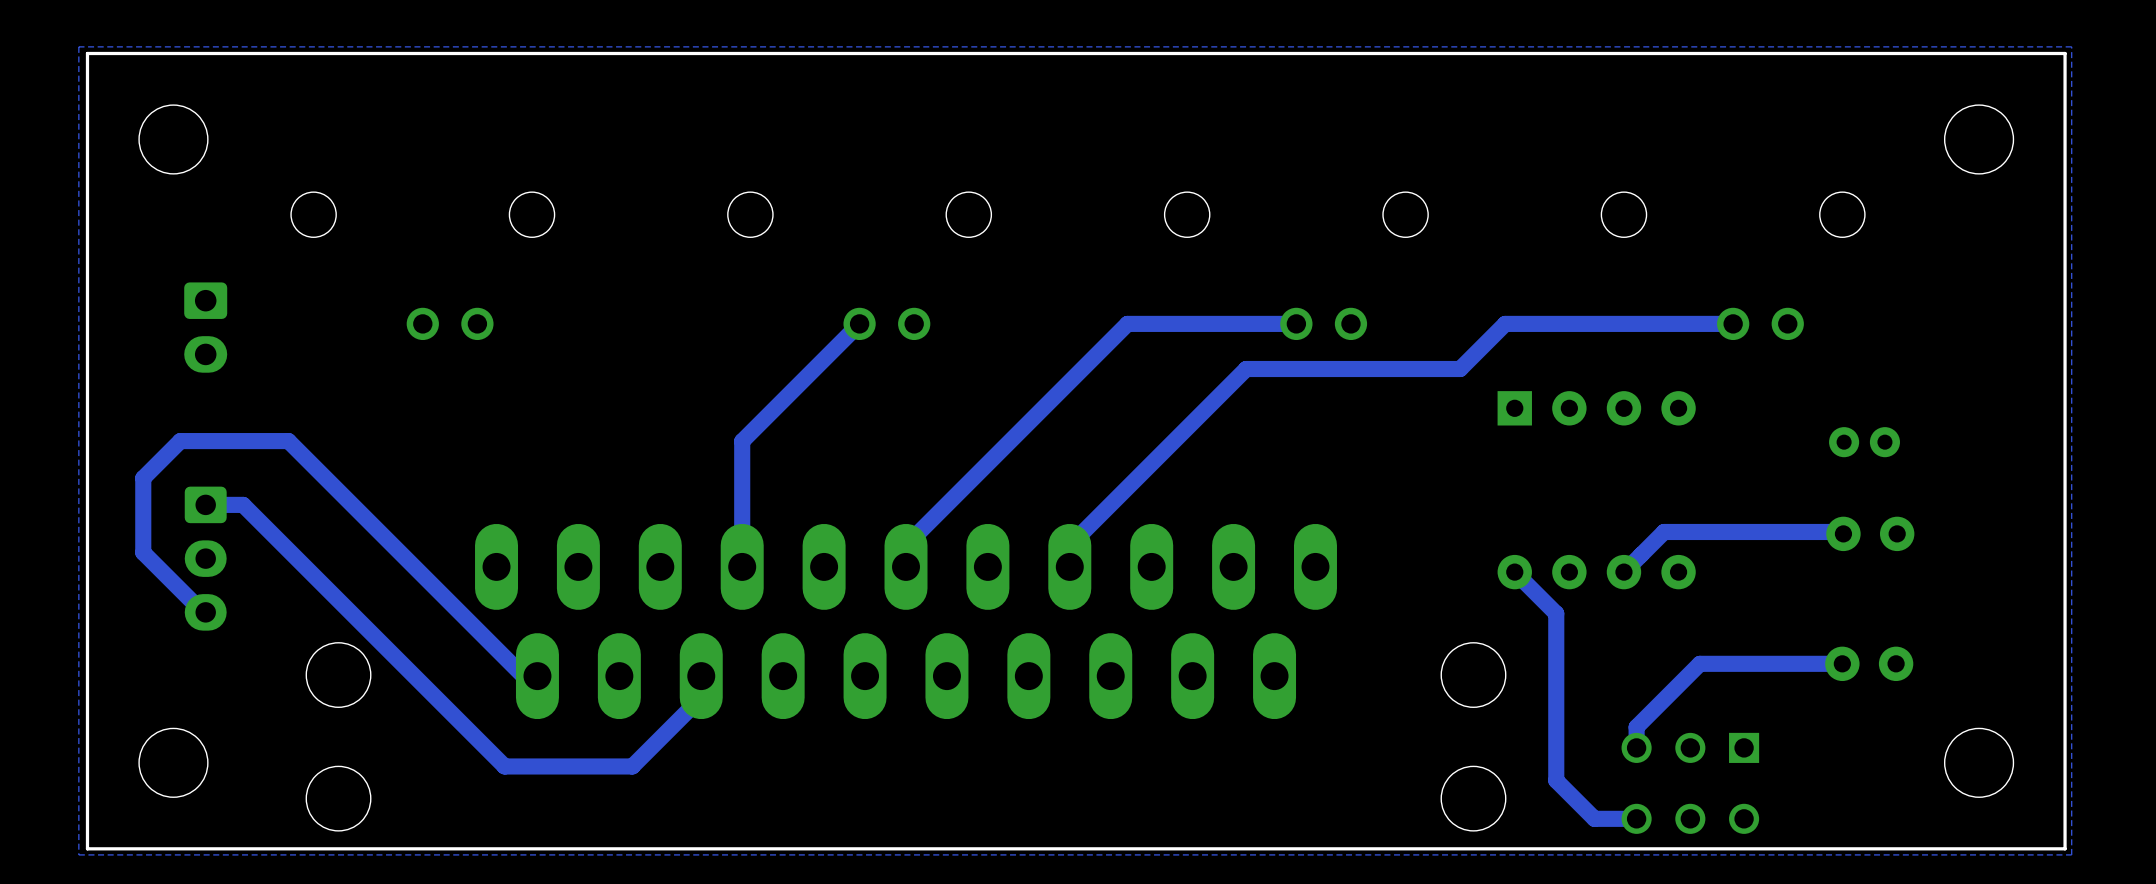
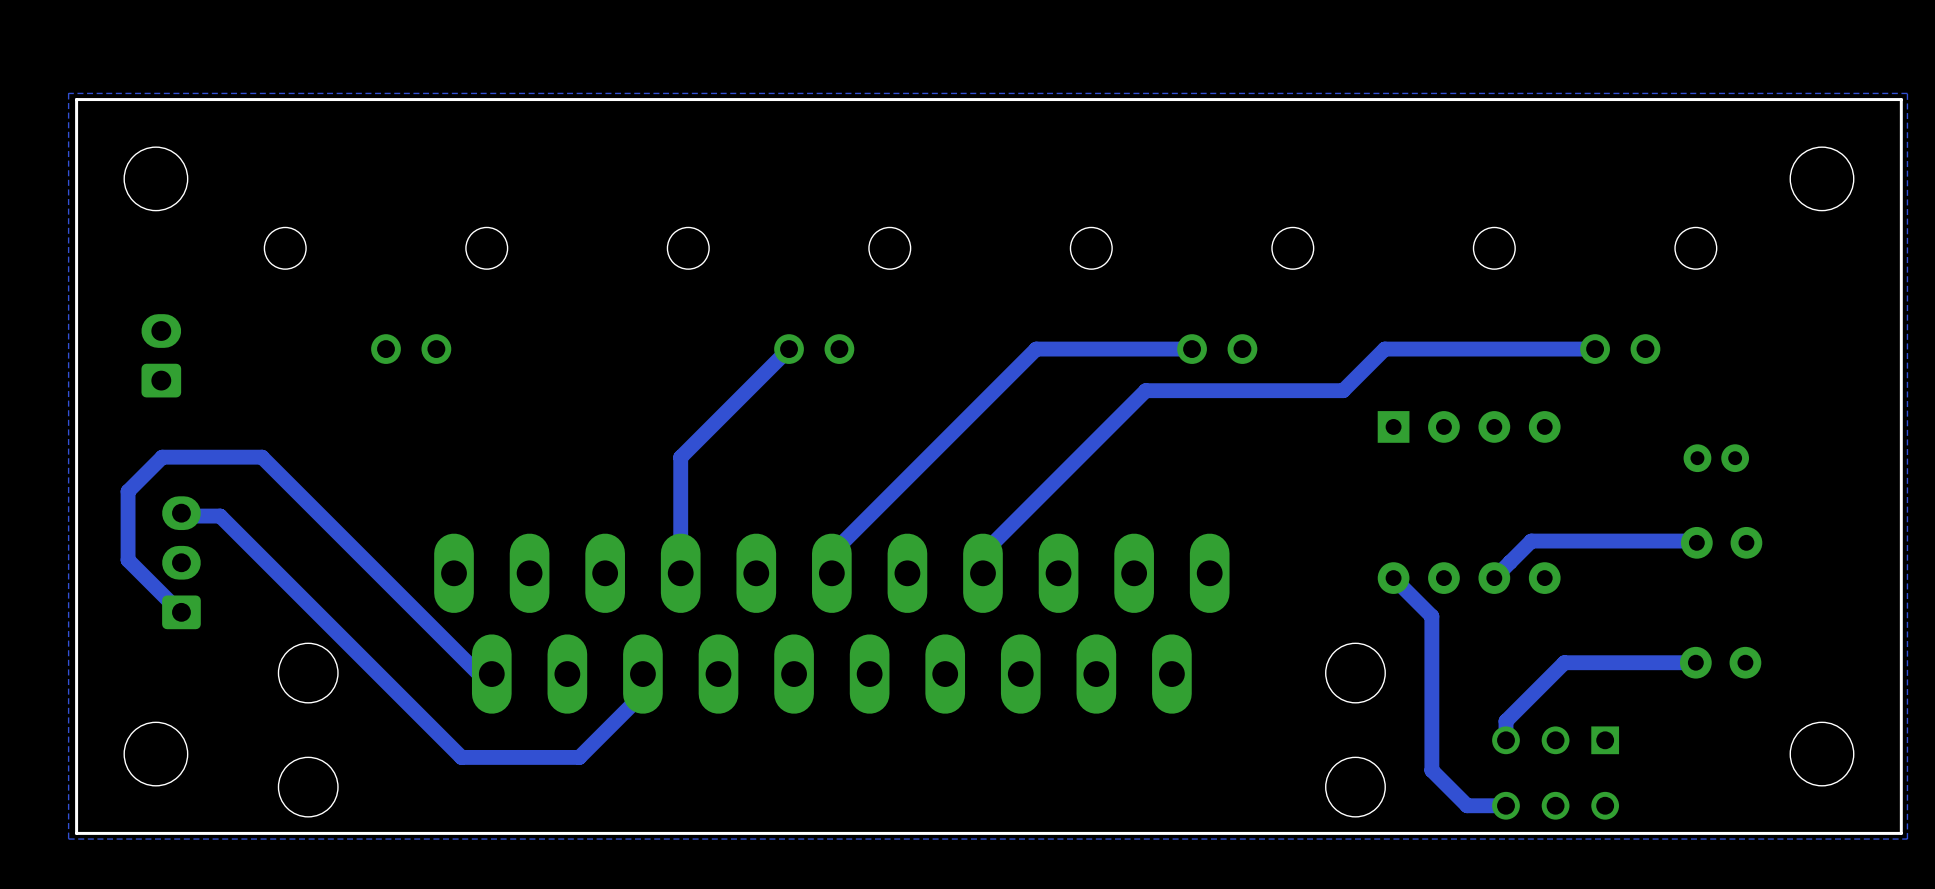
part rotation: 0° (205, 327) -> 180° (161, 355)
part rotation: 0° (205, 558) -> 180° (181, 562)

